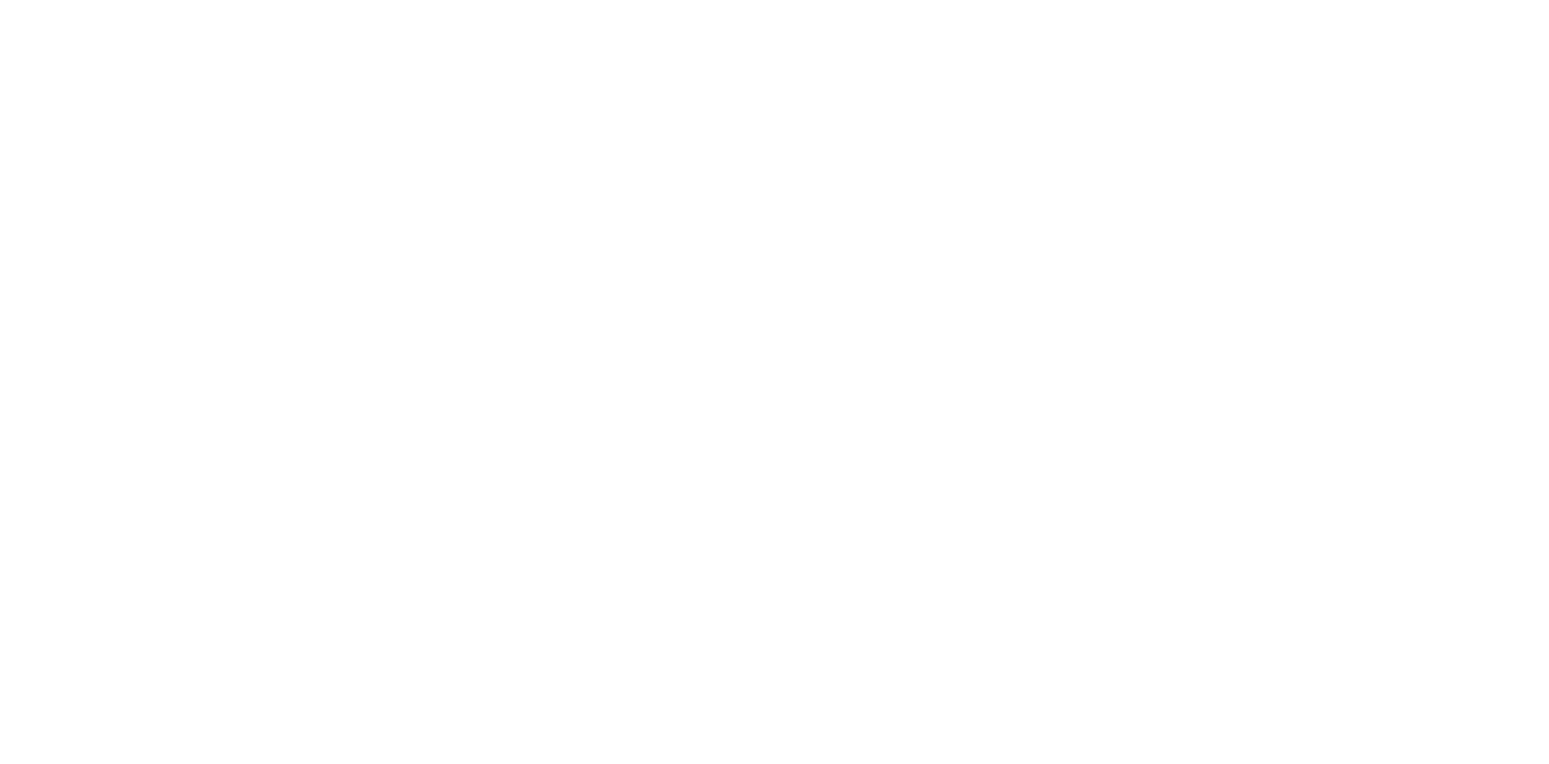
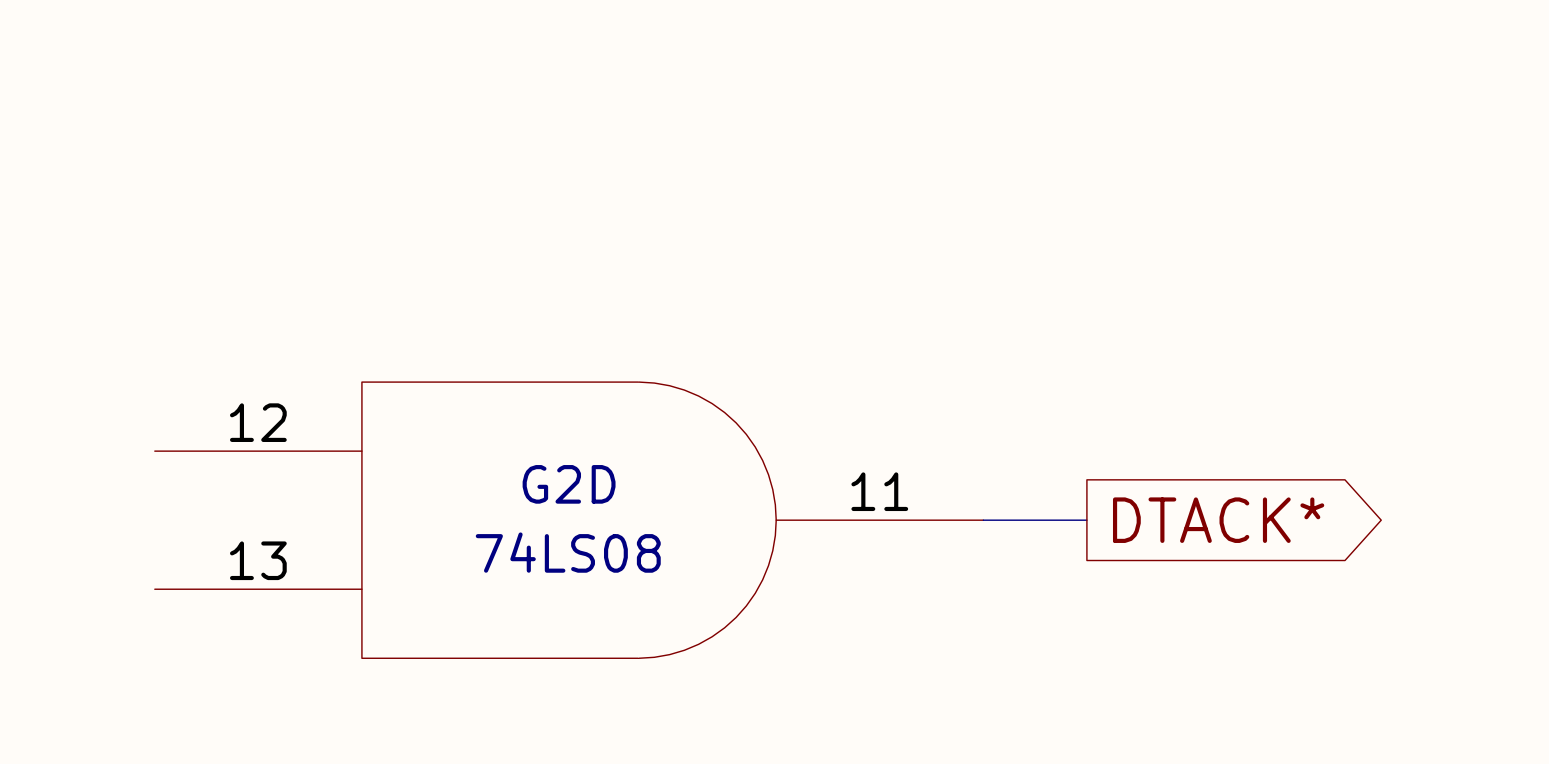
G2D: none -> 74LS08 (569, 520)
wire: none -> (983, 520) (1086, 520)
global label: none -> DTACK* (1218, 520)

